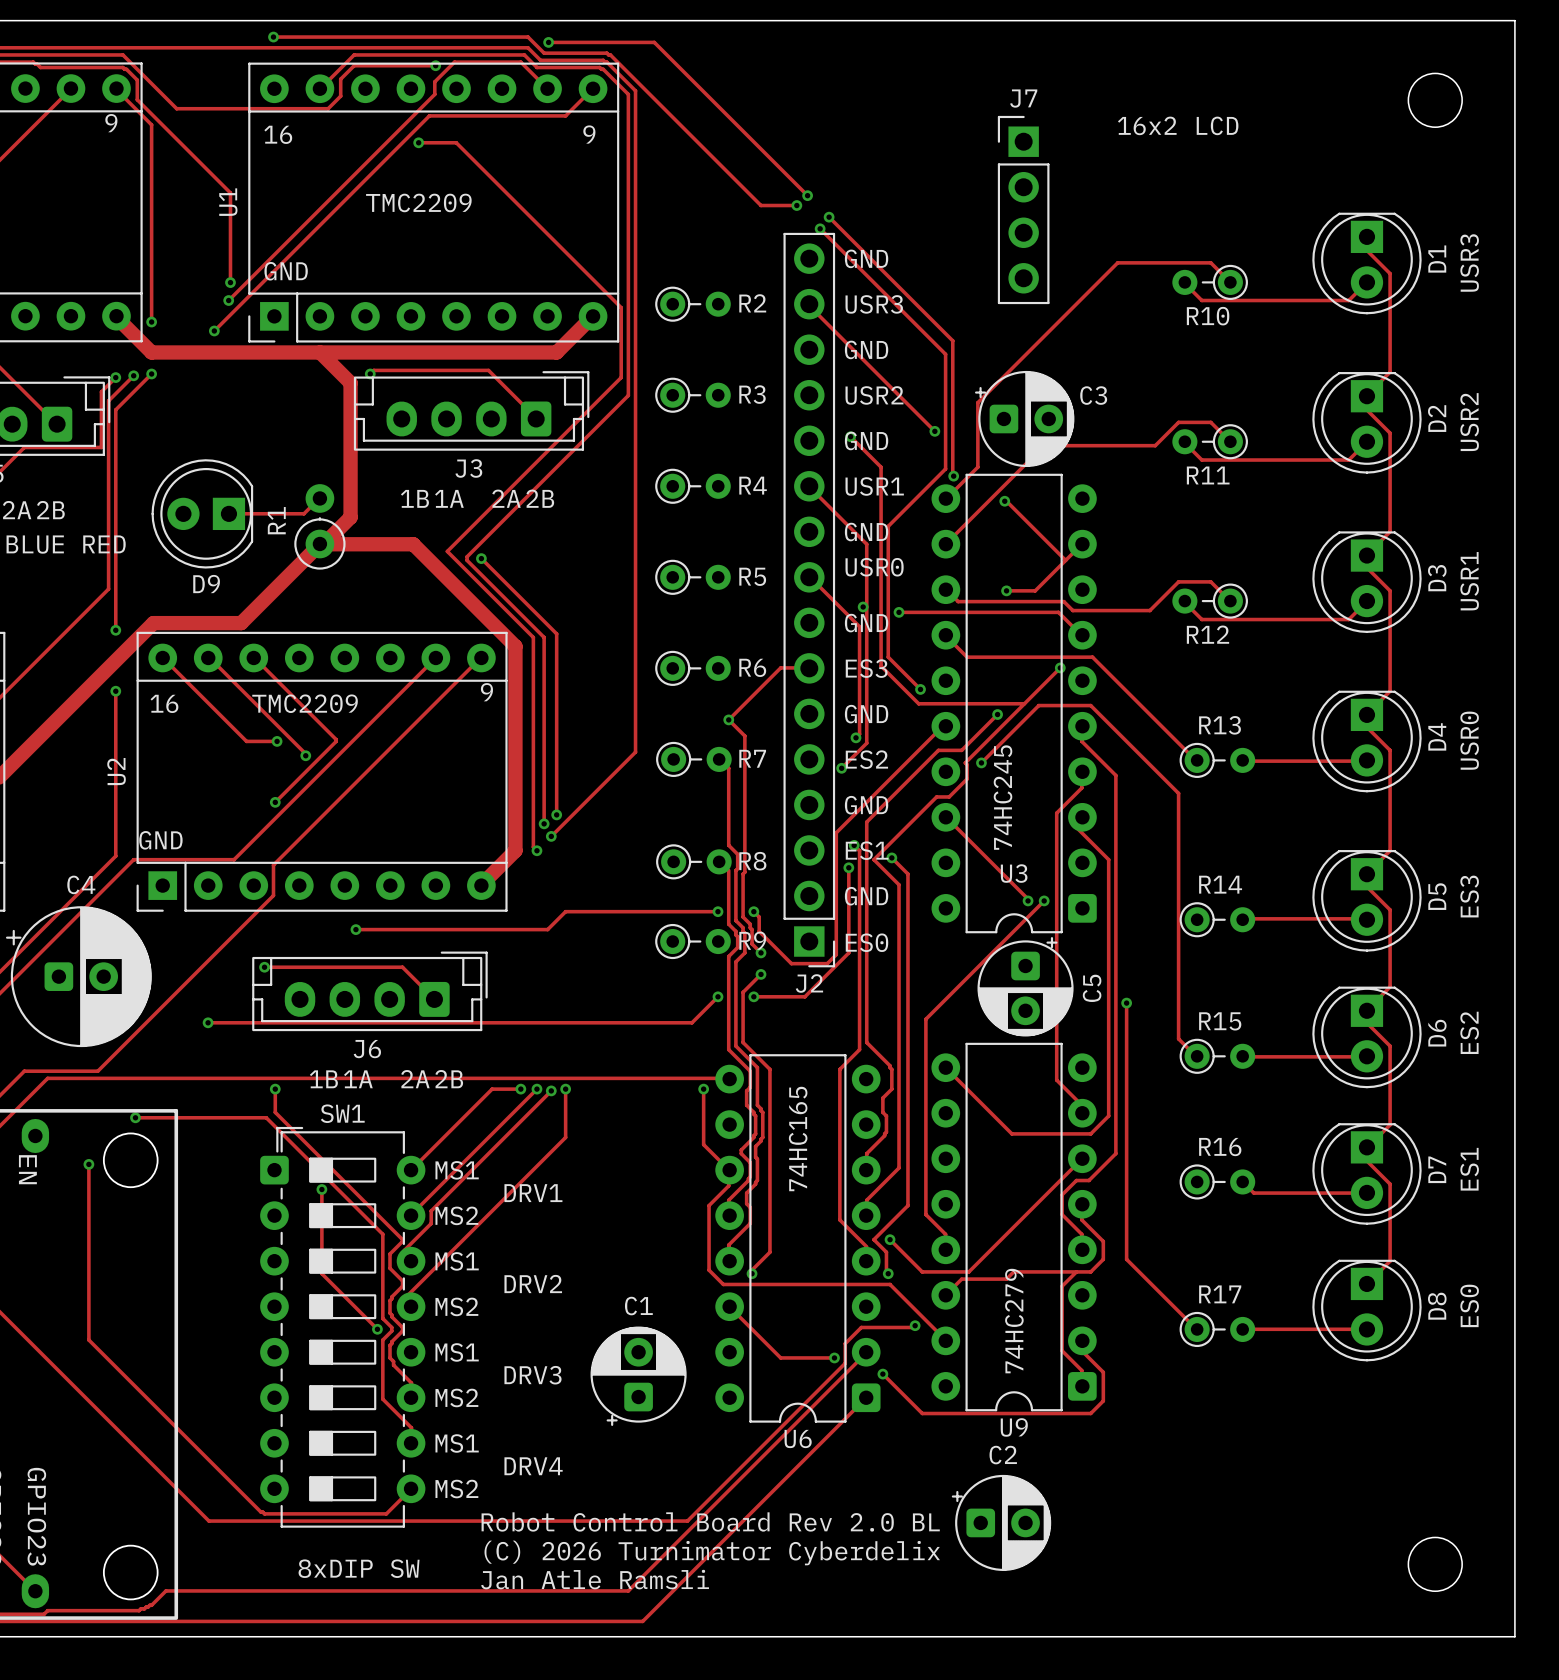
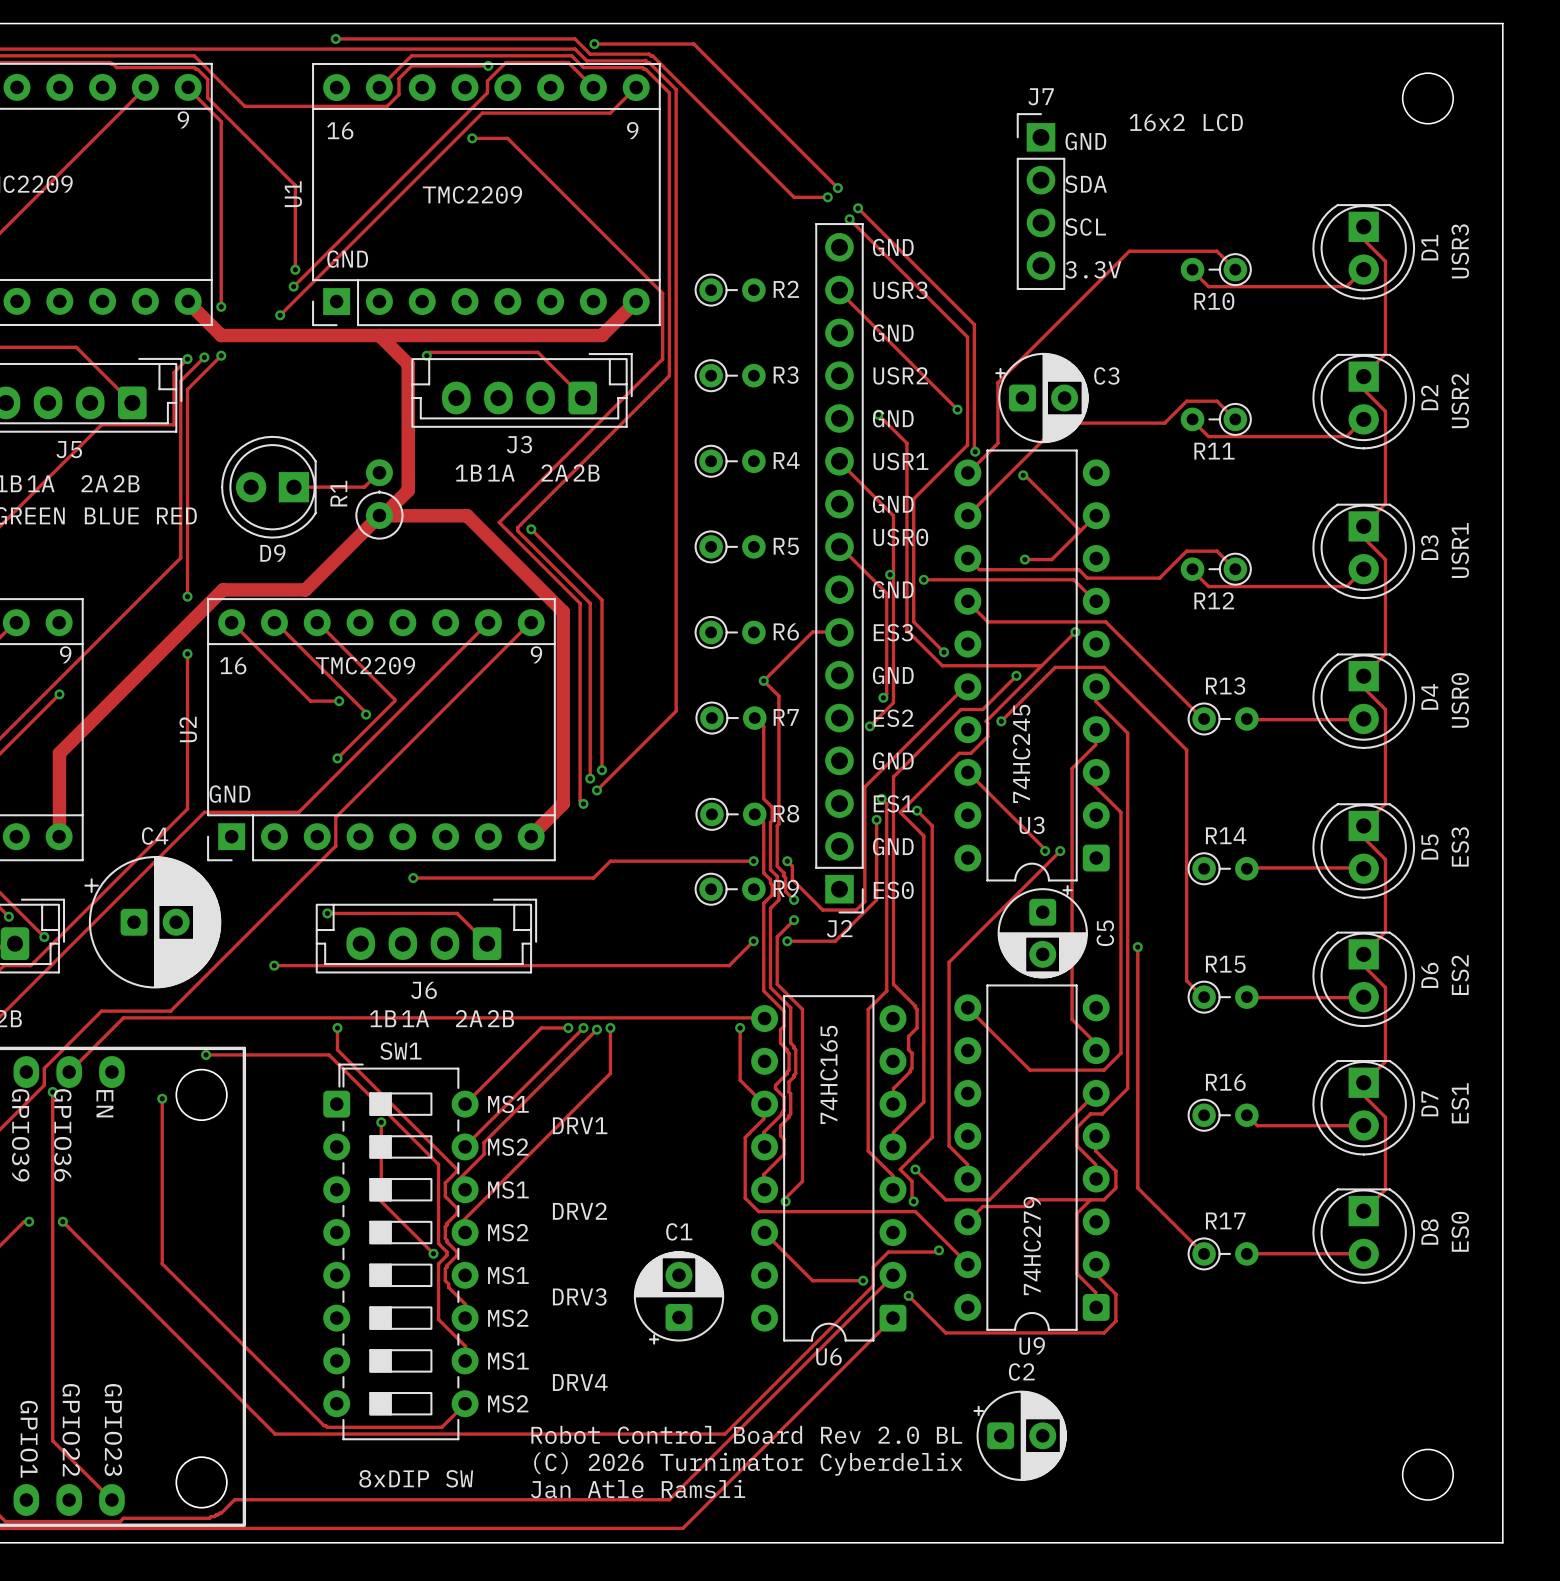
text: none -> GND (1085, 141)
text: none -> SDA (1086, 184)
text: none -> SCL (1085, 227)
text: none -> 3.3V (1093, 269)

